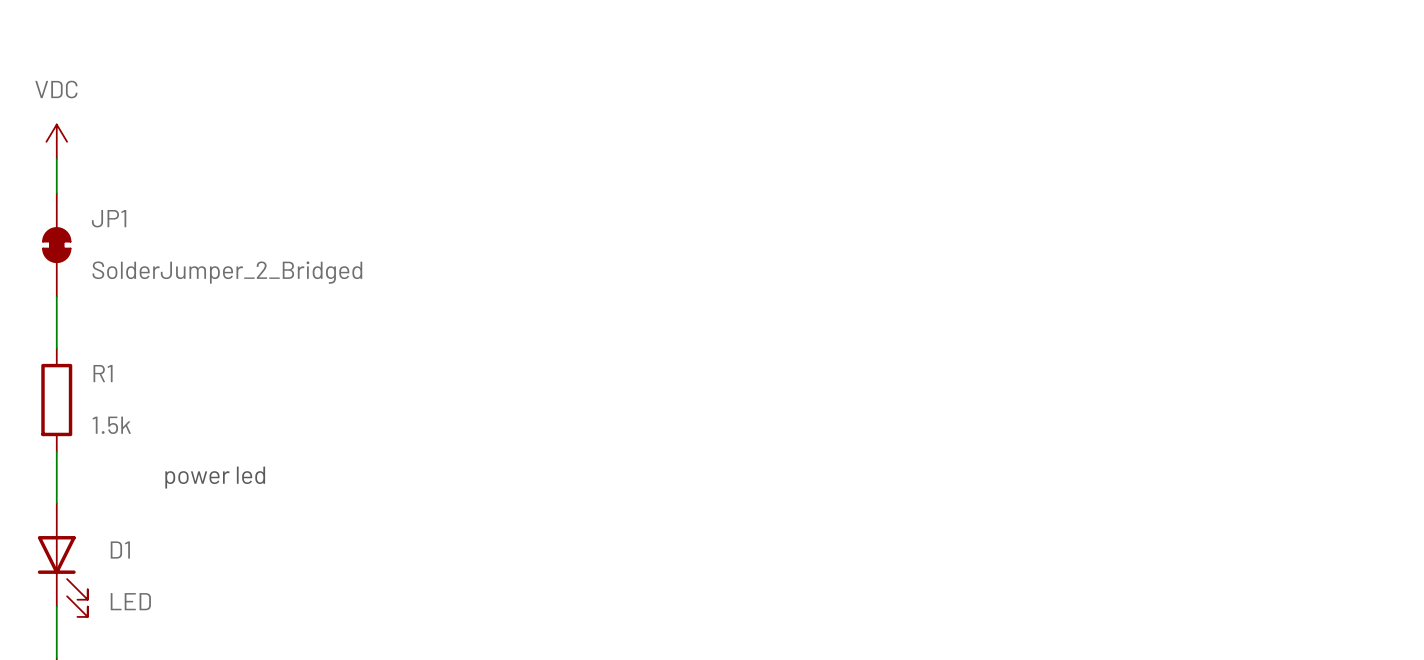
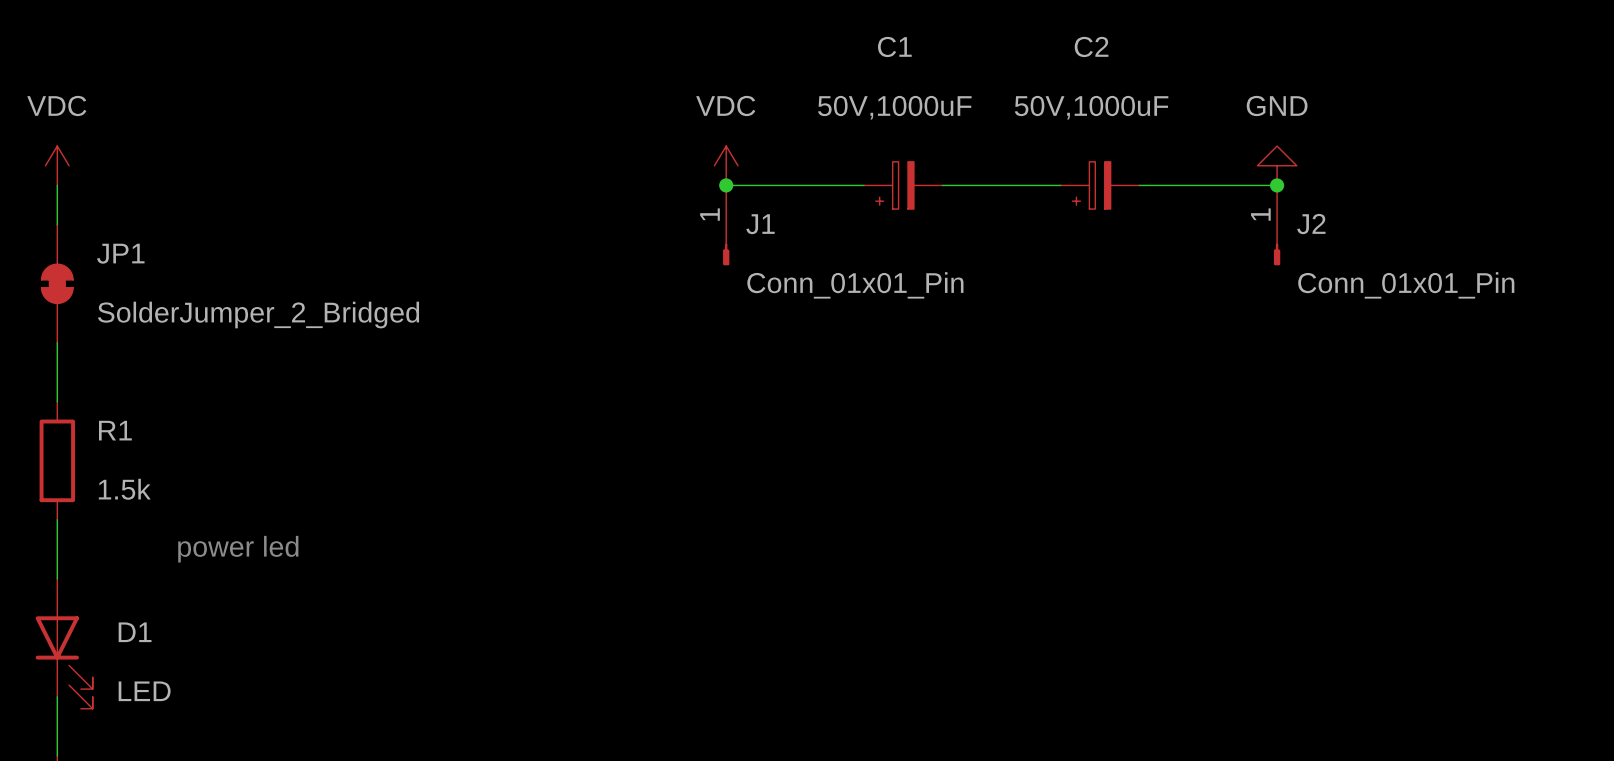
power symbol: none -> VDC (726, 165)
power symbol: none -> GND (1277, 165)
wire: none -> (726, 185) (863, 185)
junction: none -> (726, 185)
C1: none -> 50V,1000uF (903, 185)
wire: none -> (942, 185) (1060, 185)
C2: none -> 50V,1000uF (1100, 185)
wire: none -> (1139, 185) (1277, 185)
junction: none -> (1277, 185)
J1: none -> Conn_01x01_Pin (726, 225)
J2: none -> Conn_01x01_Pin (1277, 225)

